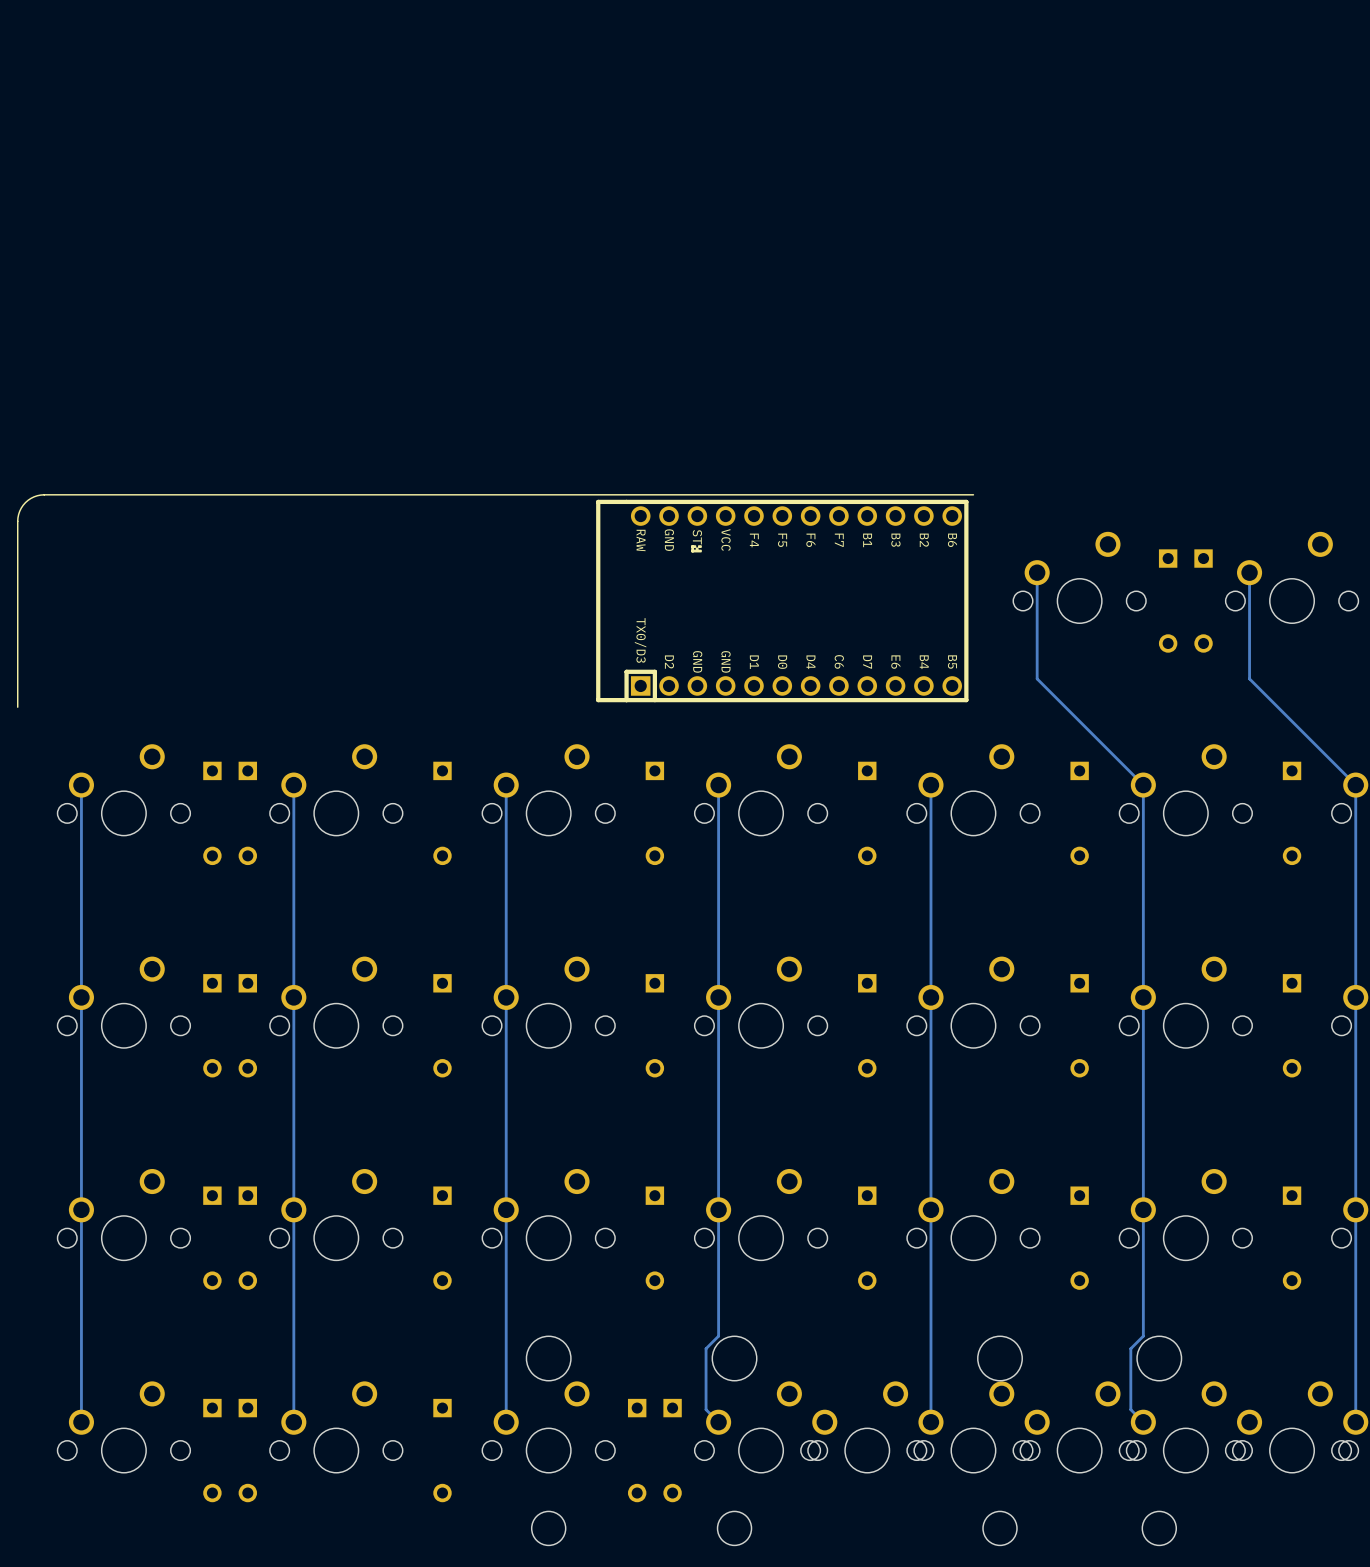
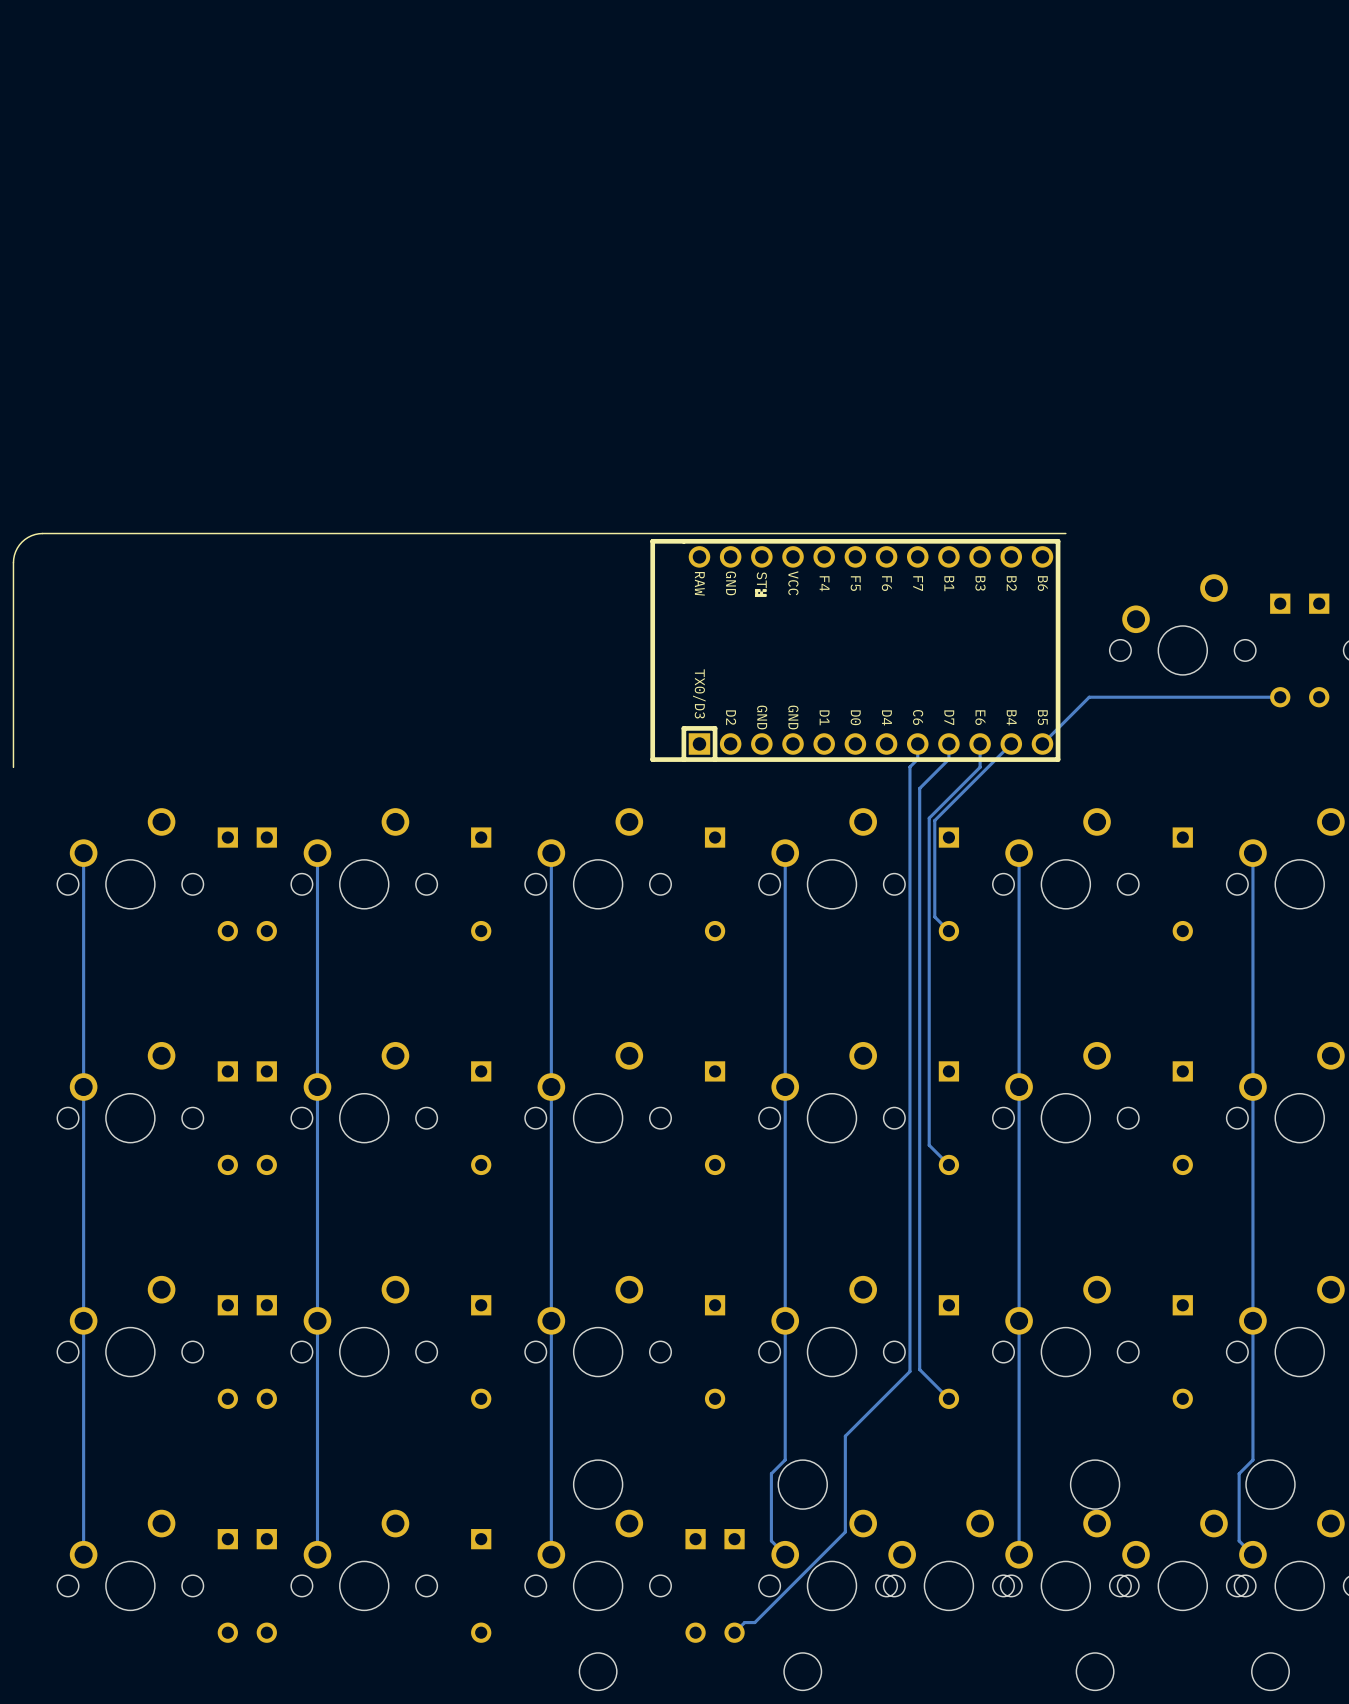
track: (1037, 572) (1037, 678) (1143, 785) -> none
track: none -> (1280, 697) (1089, 697) (1042, 744)
track: none -> (917, 744) (917, 759) (909, 767) (909, 1371) (845, 1436) (845, 1532) (754, 1622) (744, 1622) (734, 1632)
track: none -> (948, 744) (948, 759) (919, 788) (919, 1369) (948, 1398)
track: none -> (980, 744) (980, 767) (929, 818) (929, 1145) (948, 1164)
track: none -> (1011, 744) (934, 820) (934, 916) (948, 931)

